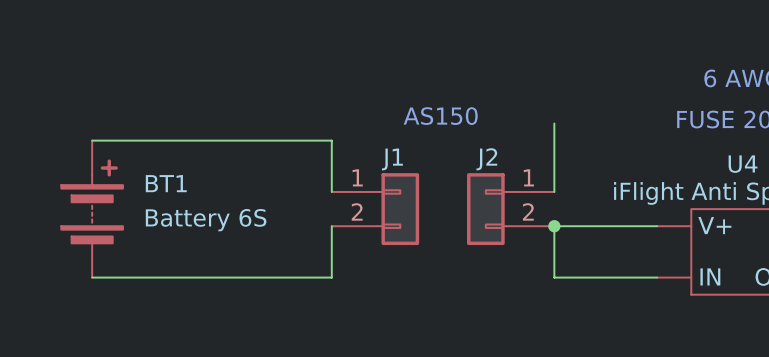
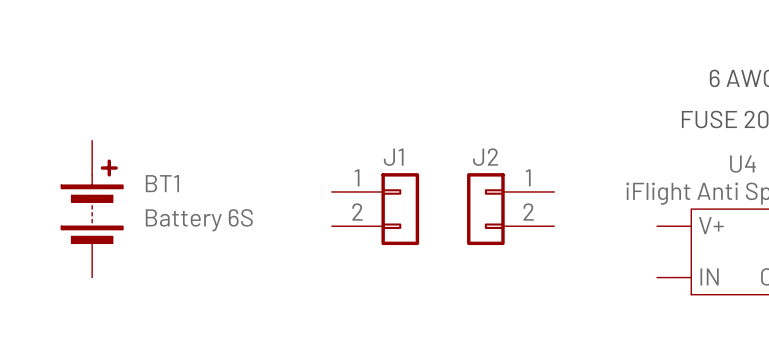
text: AS150 (440, 116) -> none
wire: (554, 123) (554, 191) -> none
wire: (92, 140) (331, 140) (331, 191) -> none
wire: (331, 226) (331, 277) (92, 277) -> none
junction: (554, 226) -> none
wire: (657, 226) (554, 226) (554, 277) (657, 277) -> none

